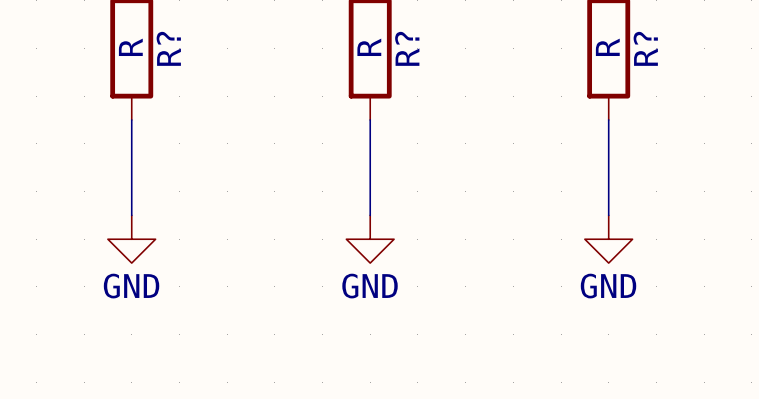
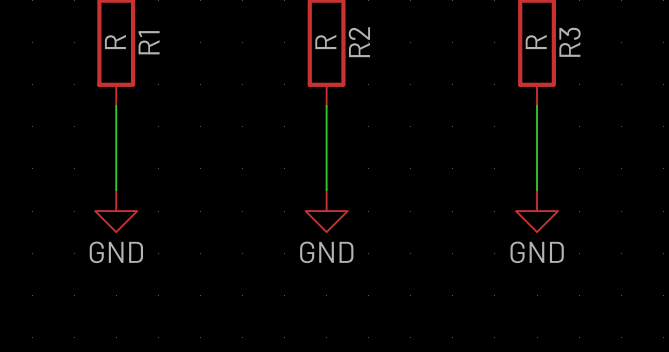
R? name: R? (168, 48) -> R1 (149, 42)
R? name: R? (407, 48) -> R2 (359, 42)
R? name: R? (645, 48) -> R3 (570, 42)

